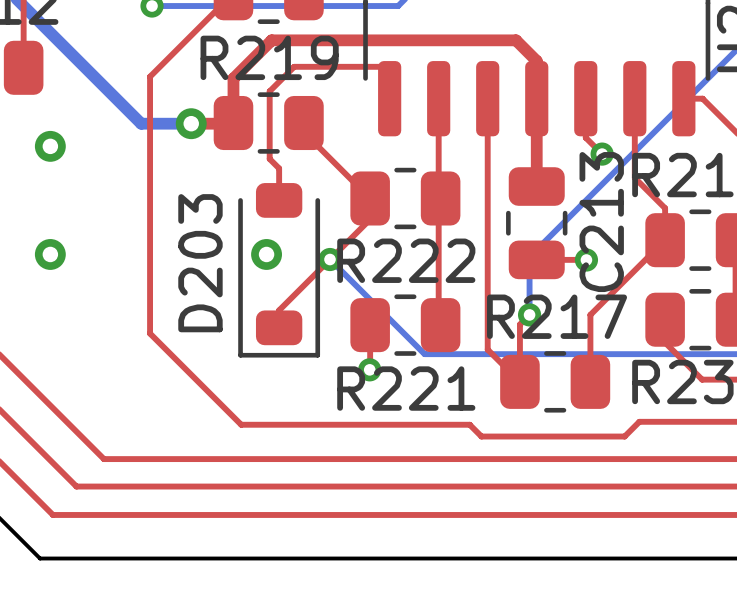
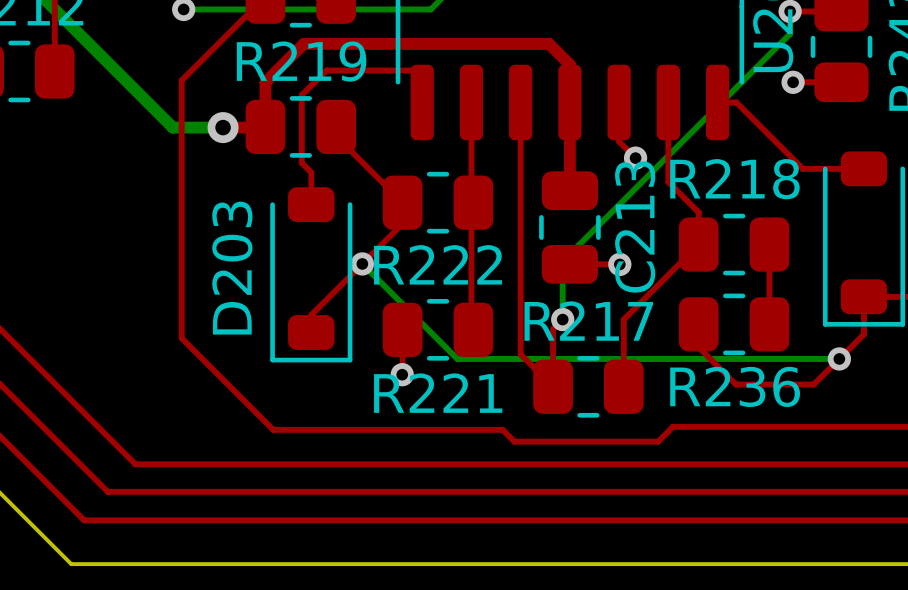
via: (50, 146) -> none
via: (50, 254) -> none
via: (266, 254) -> none

